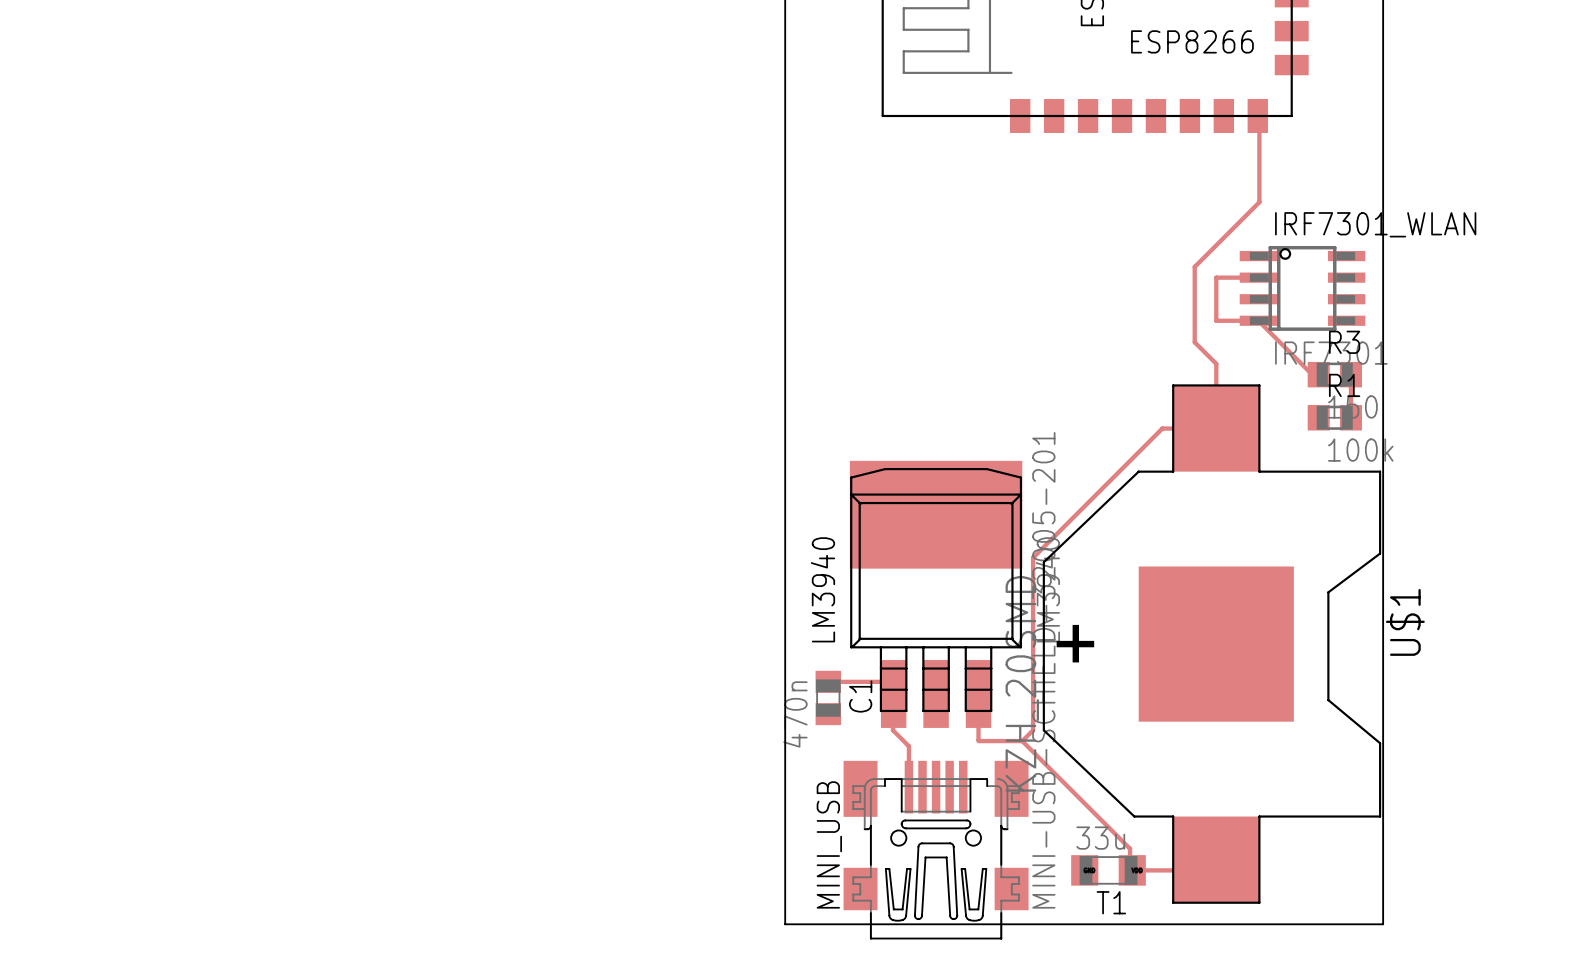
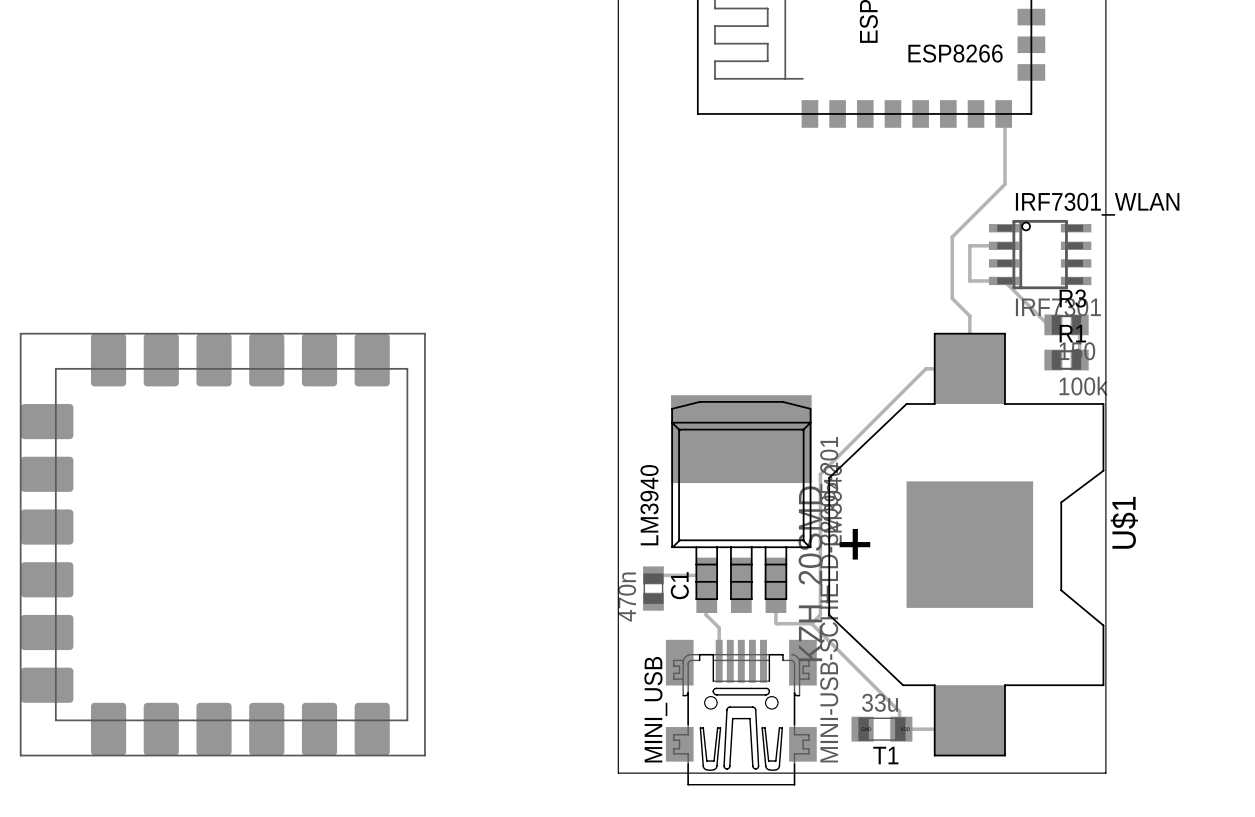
part: none -> (222, 544)

